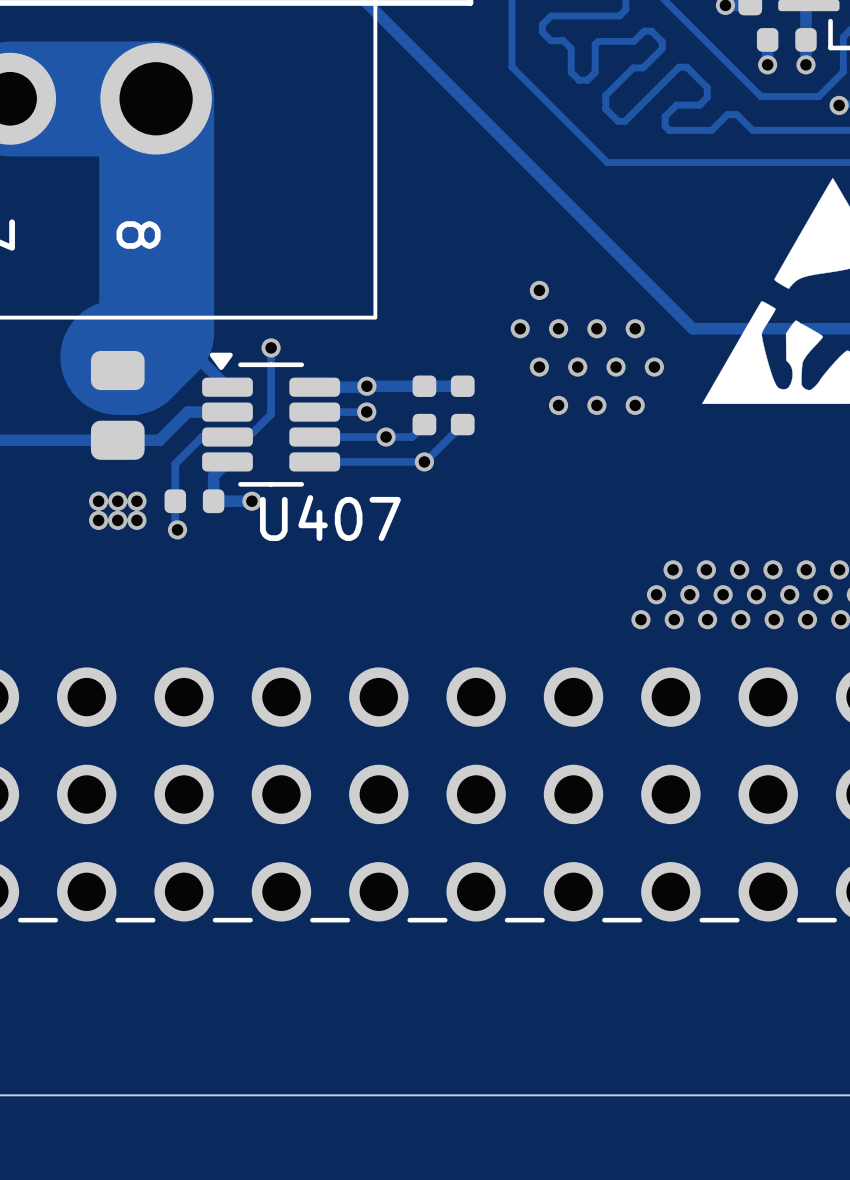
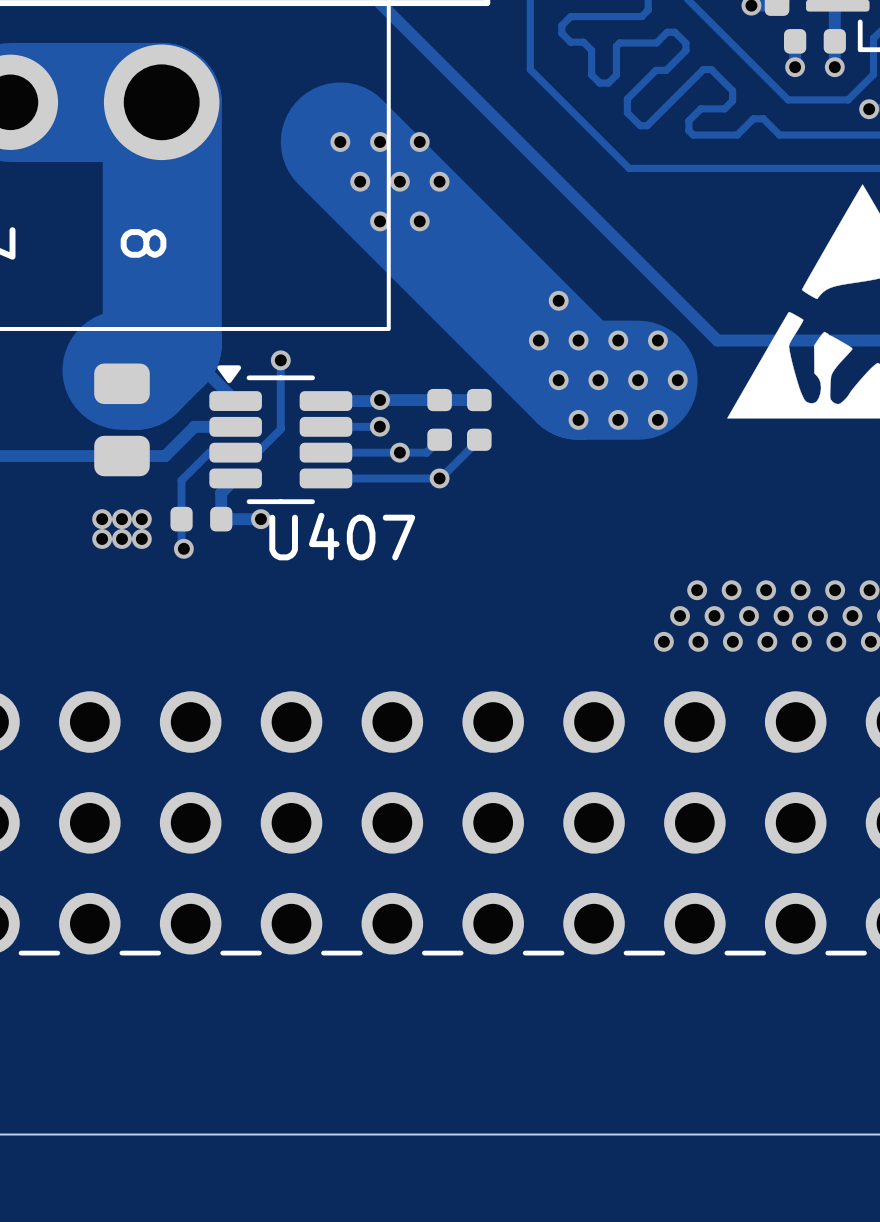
track: none -> (340, 142) (578, 380) (638, 380)
via: none -> (340, 142)
via: none -> (380, 142)
via: none -> (419, 142)
via: none -> (360, 181)
via: none -> (399, 181)
via: none -> (439, 181)
via: none -> (380, 221)
via: none -> (419, 221)

